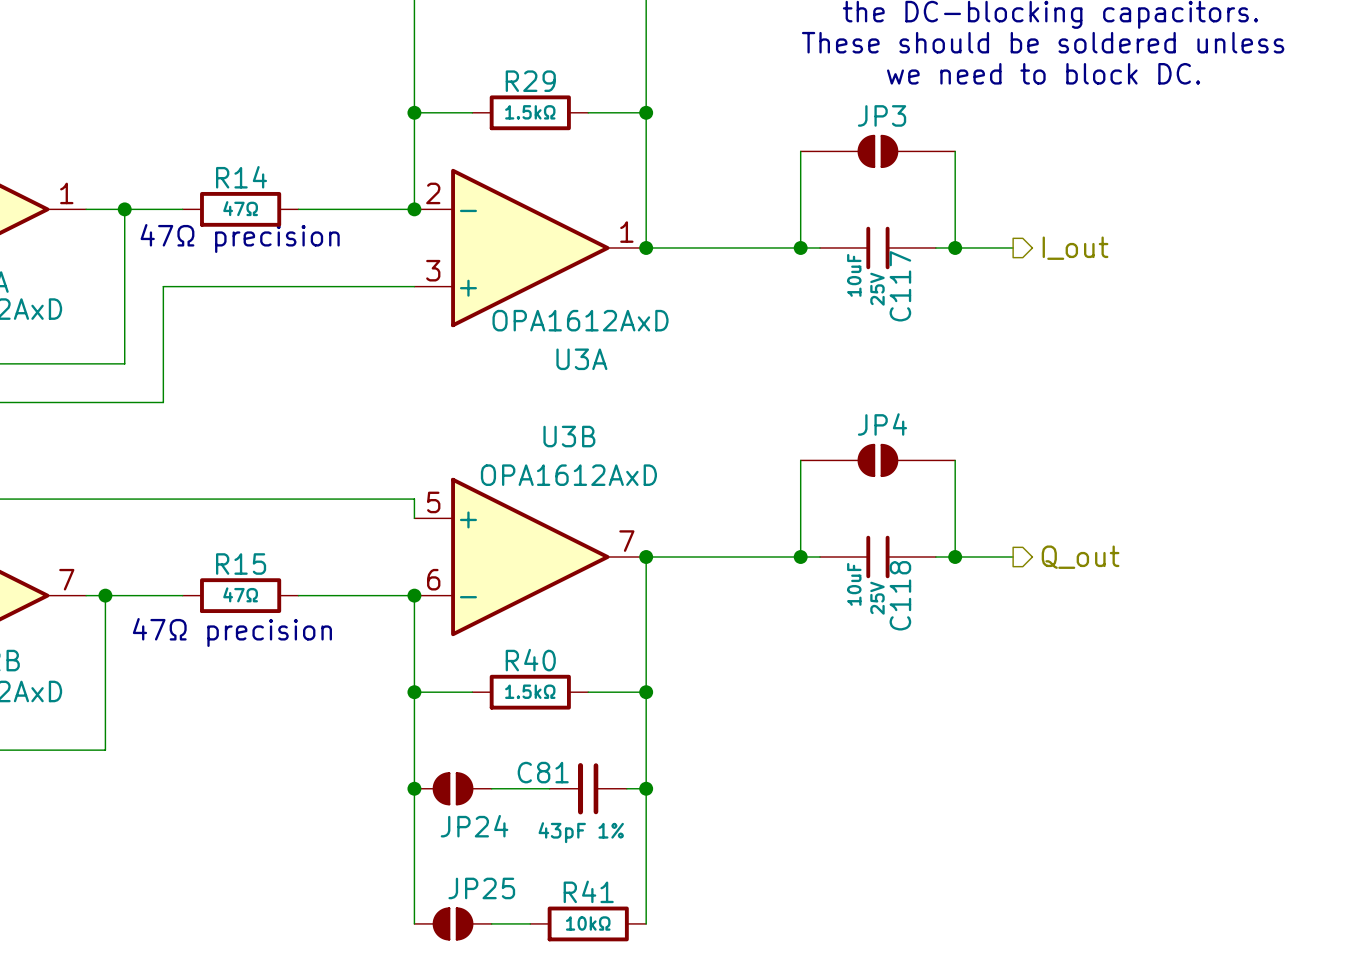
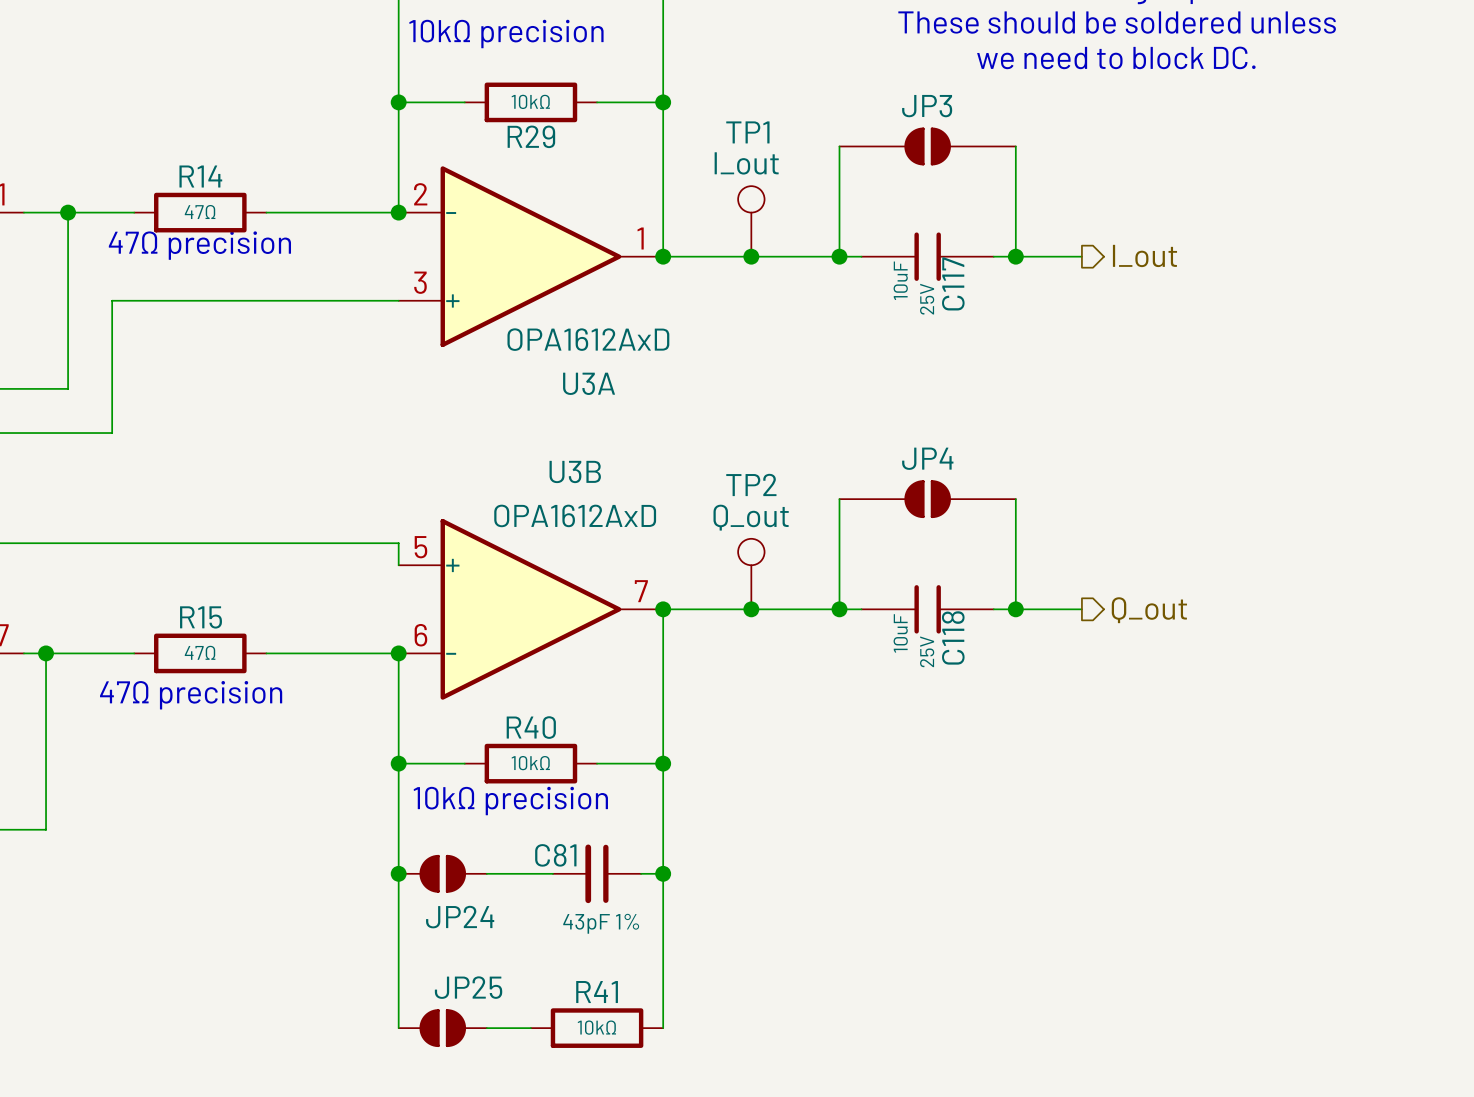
text: none -> 10kΩ precision (506, 34)
R29 name position: R29 (530, 81) -> R29 (531, 136)
R29 value: 1.5kΩ (530, 112) -> 10kΩ (530, 101)
TP1: none -> I_out (751, 221)
junction: none -> (751, 256)
TP2: none -> Q_out (751, 574)
junction: none -> (751, 609)
R40 value: 1.5kΩ (530, 691) -> 10kΩ (530, 763)
text: none -> 10kΩ precision (510, 801)

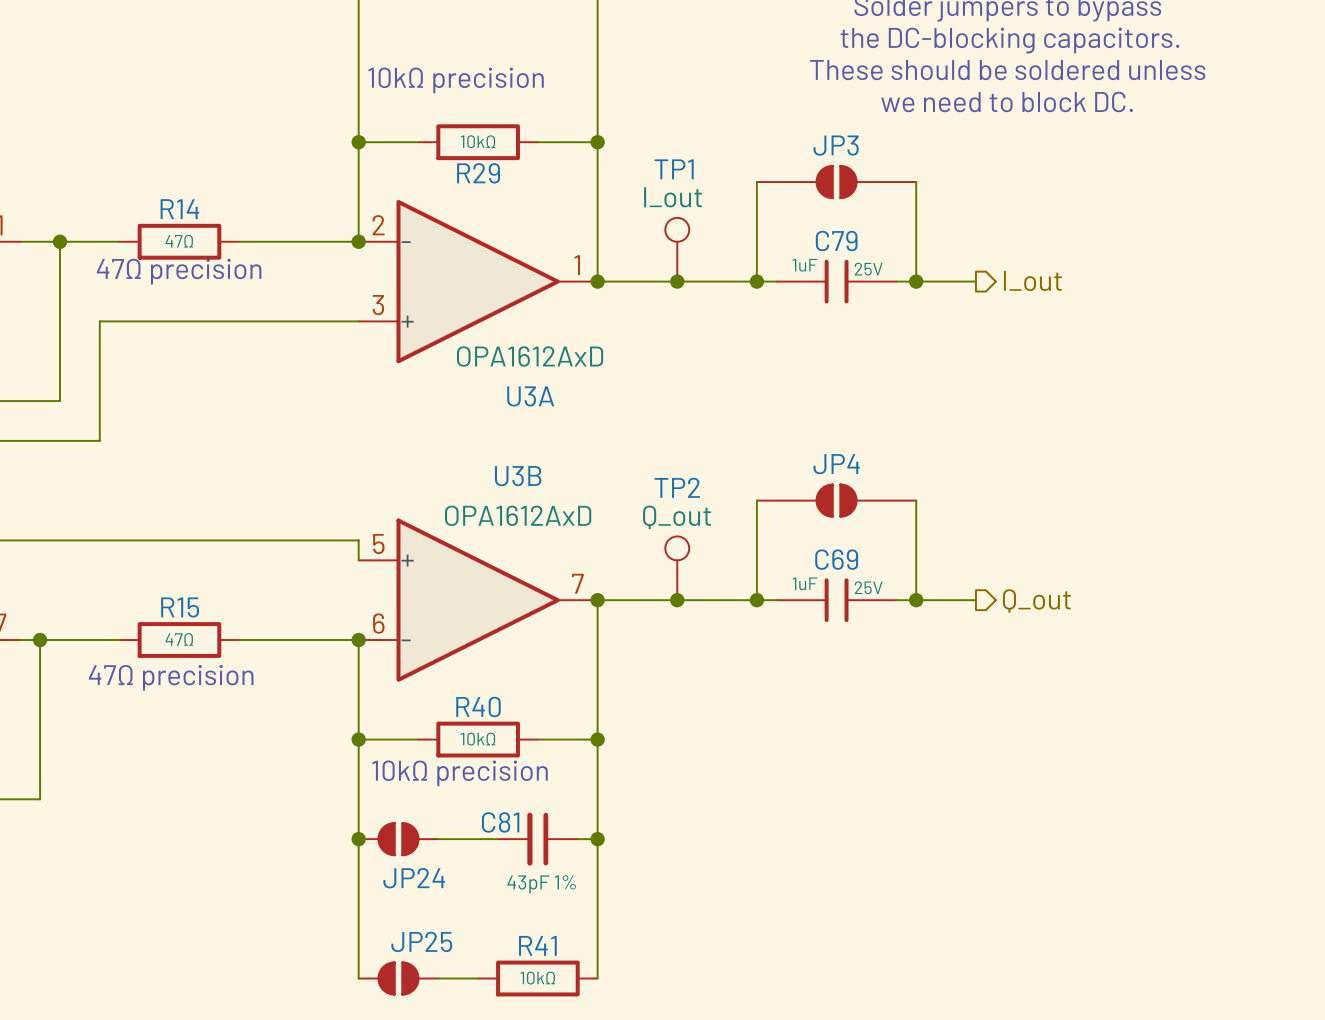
C117 value: 10uF (900, 280) -> 1uF (805, 265)
C117 name: C117 (953, 283) -> C79 (836, 241)
C117 text rotation: 0° (927, 299) -> 90° clockwise (868, 269)
C117 text position: 25V (927, 299) -> 25V (868, 269)
C118 value: 10uF (900, 633) -> 1uF (805, 583)
C118 name: C118 (953, 637) -> C69 (836, 559)
C118 text rotation: 0° (927, 651) -> 90° clockwise (868, 587)
C118 text position: 25V (927, 651) -> 25V (868, 587)

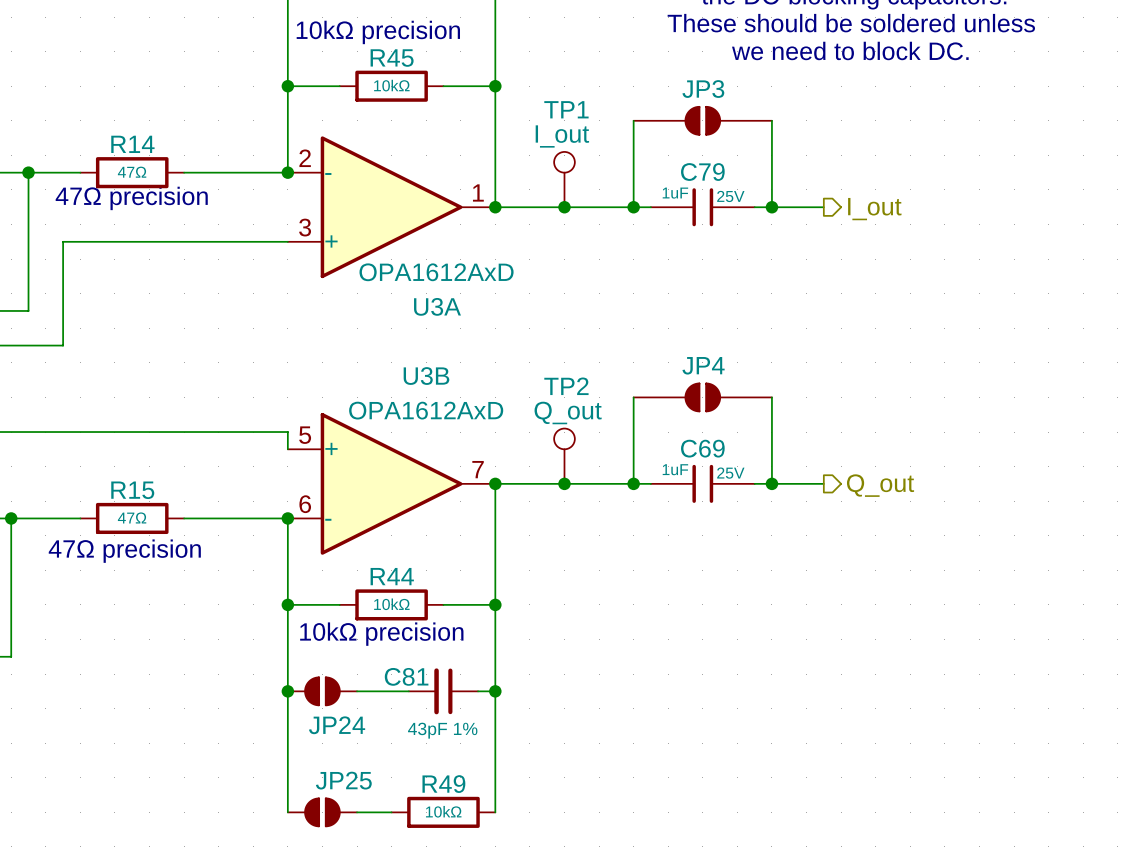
R29 name: R29 (478, 173) -> R45 (392, 58)
R40 name: R40 (478, 706) -> R44 (392, 576)
R41 name: R41 (537, 945) -> R49 (443, 784)

